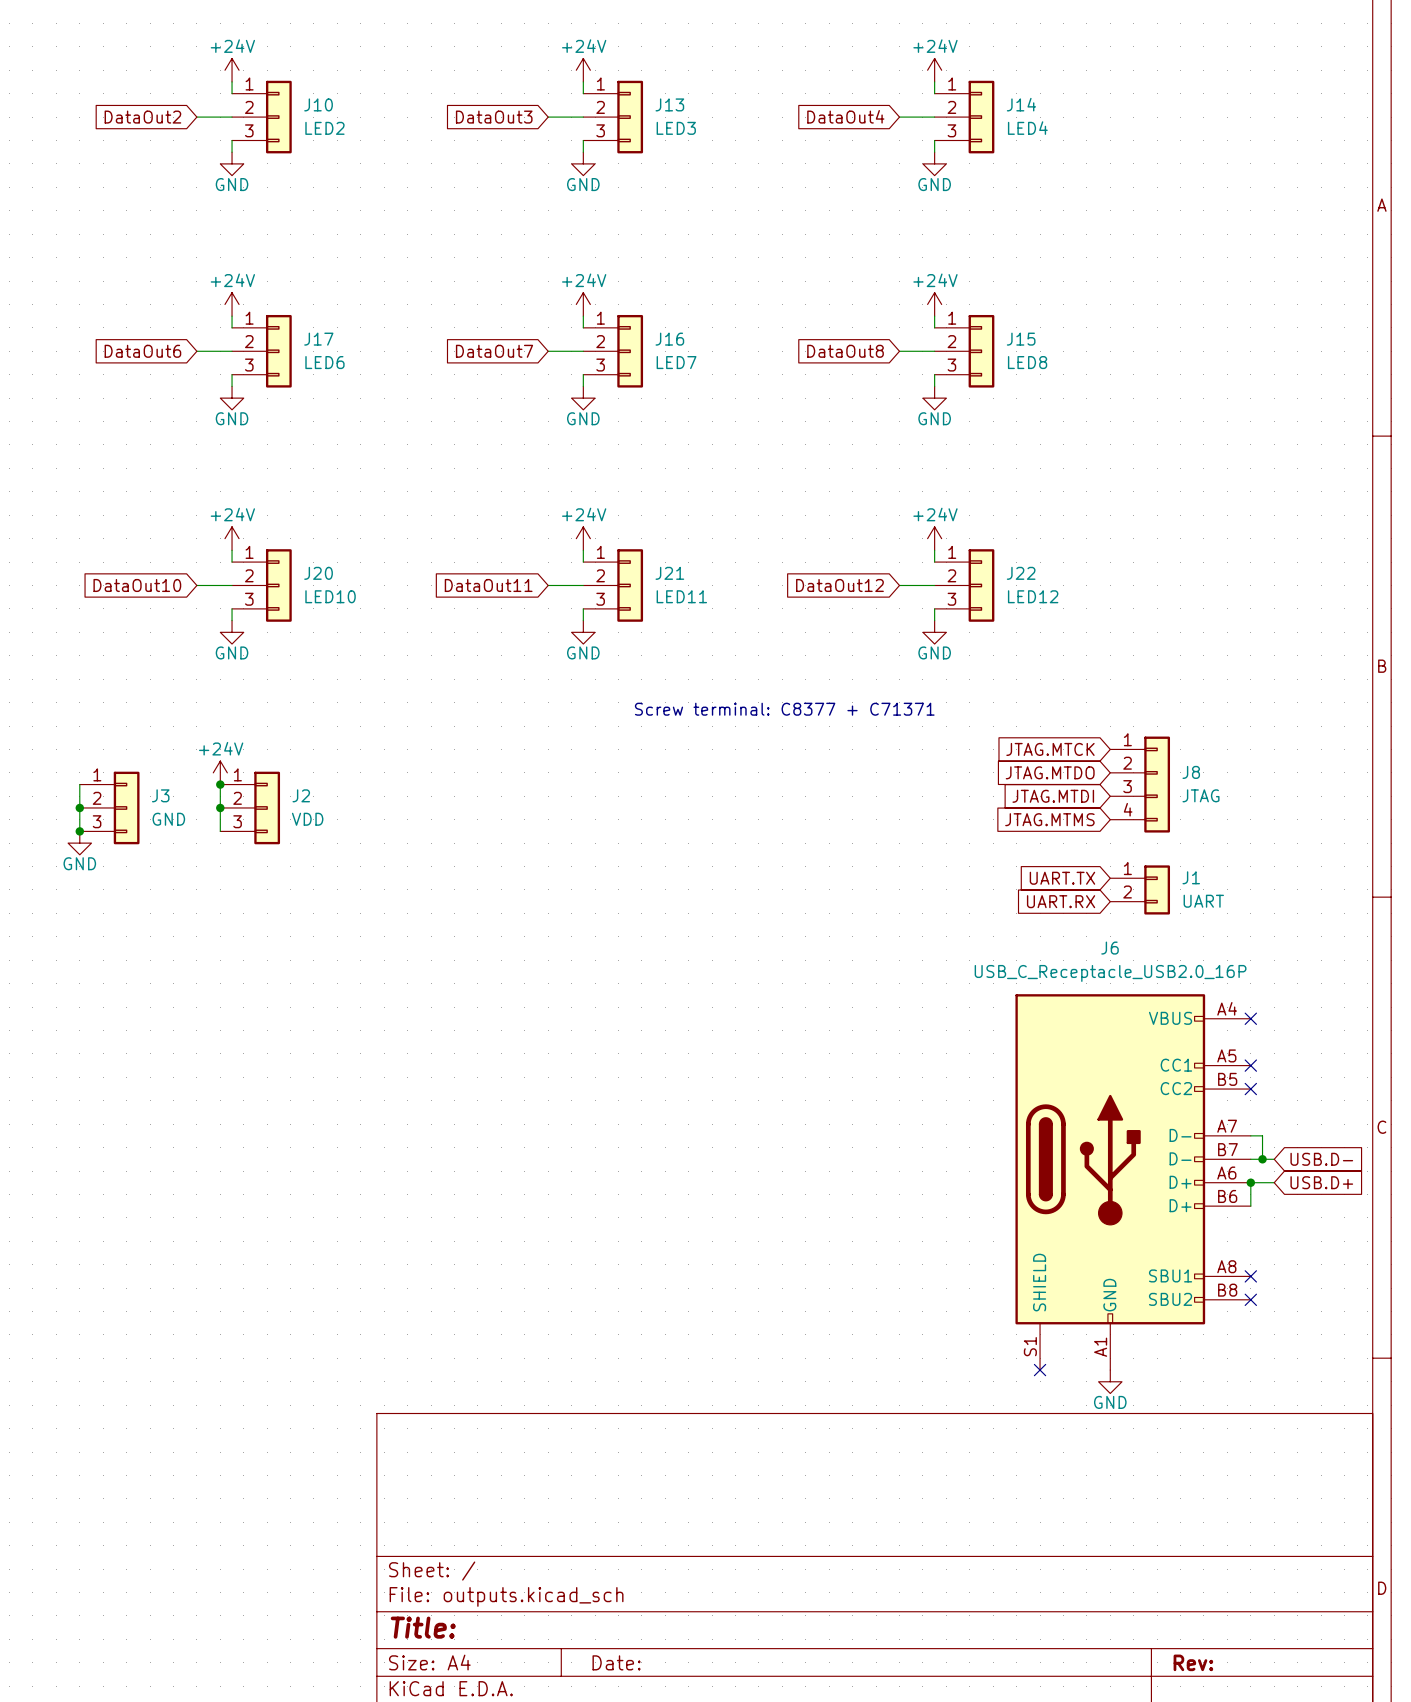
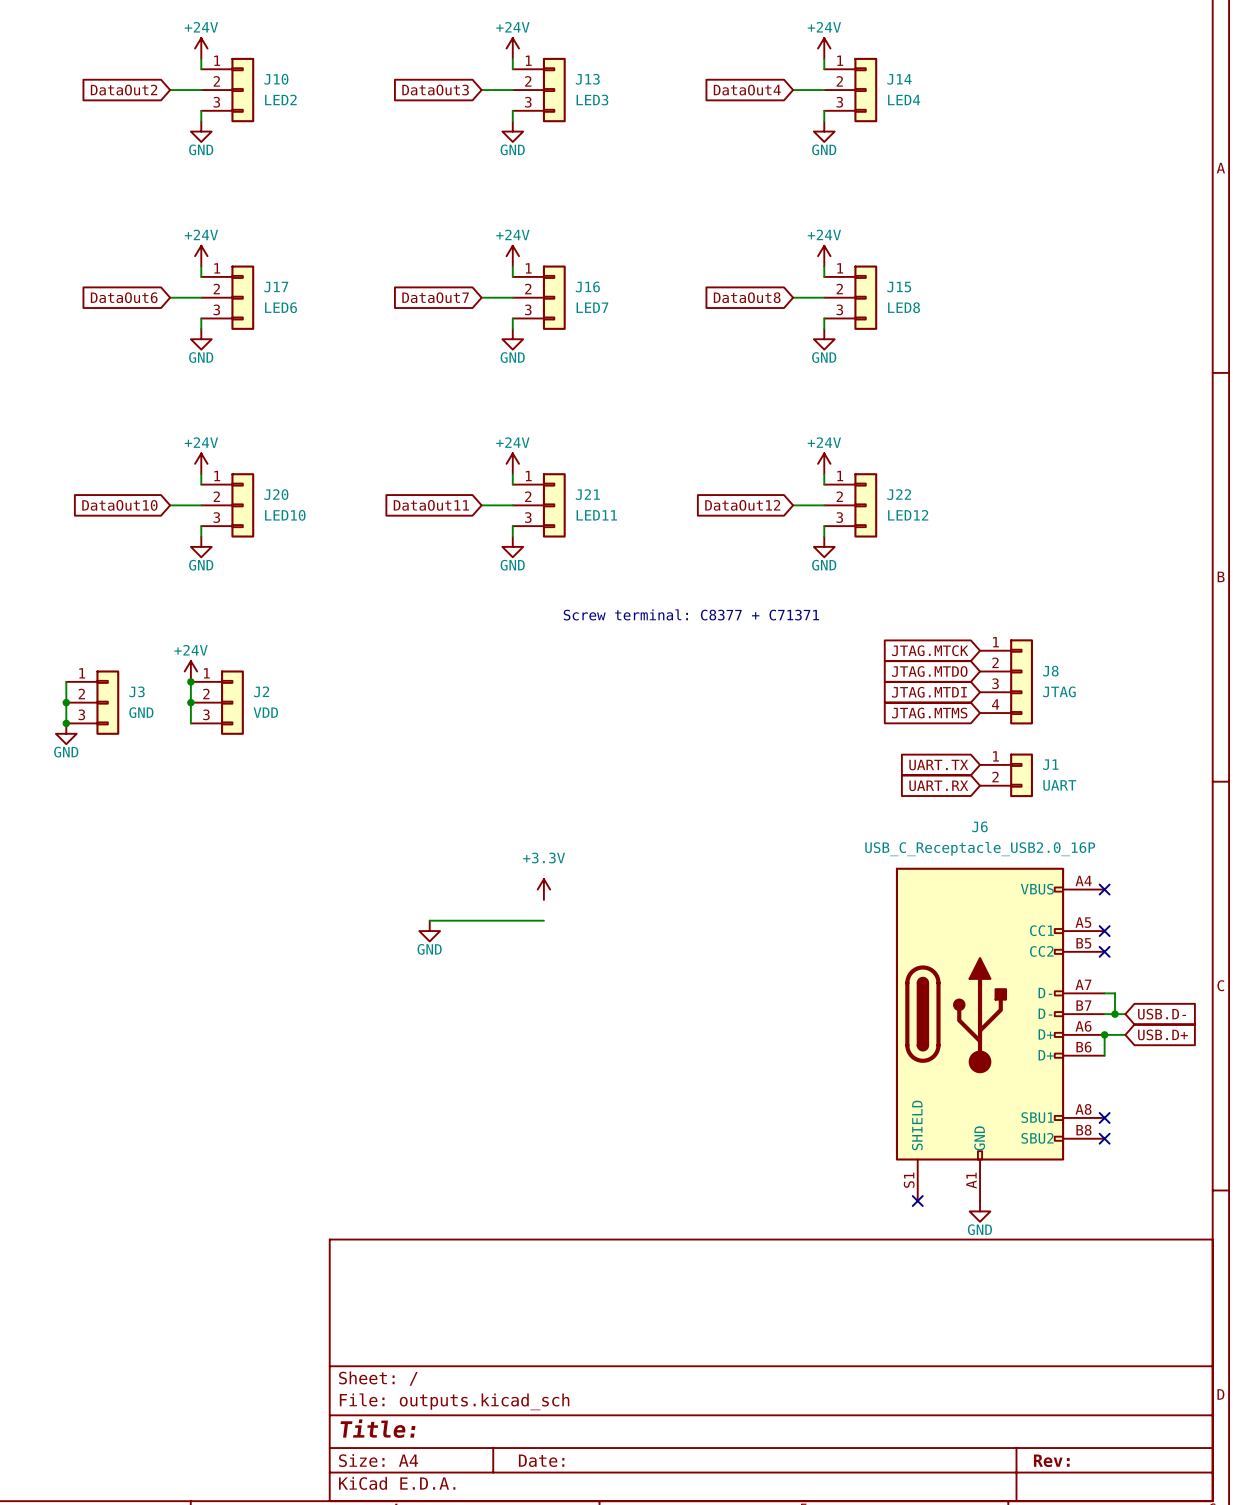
power symbol: none -> +3.3V (543, 889)
wire: none -> (429, 920) (543, 920)
power symbol: none -> GND (429, 931)

